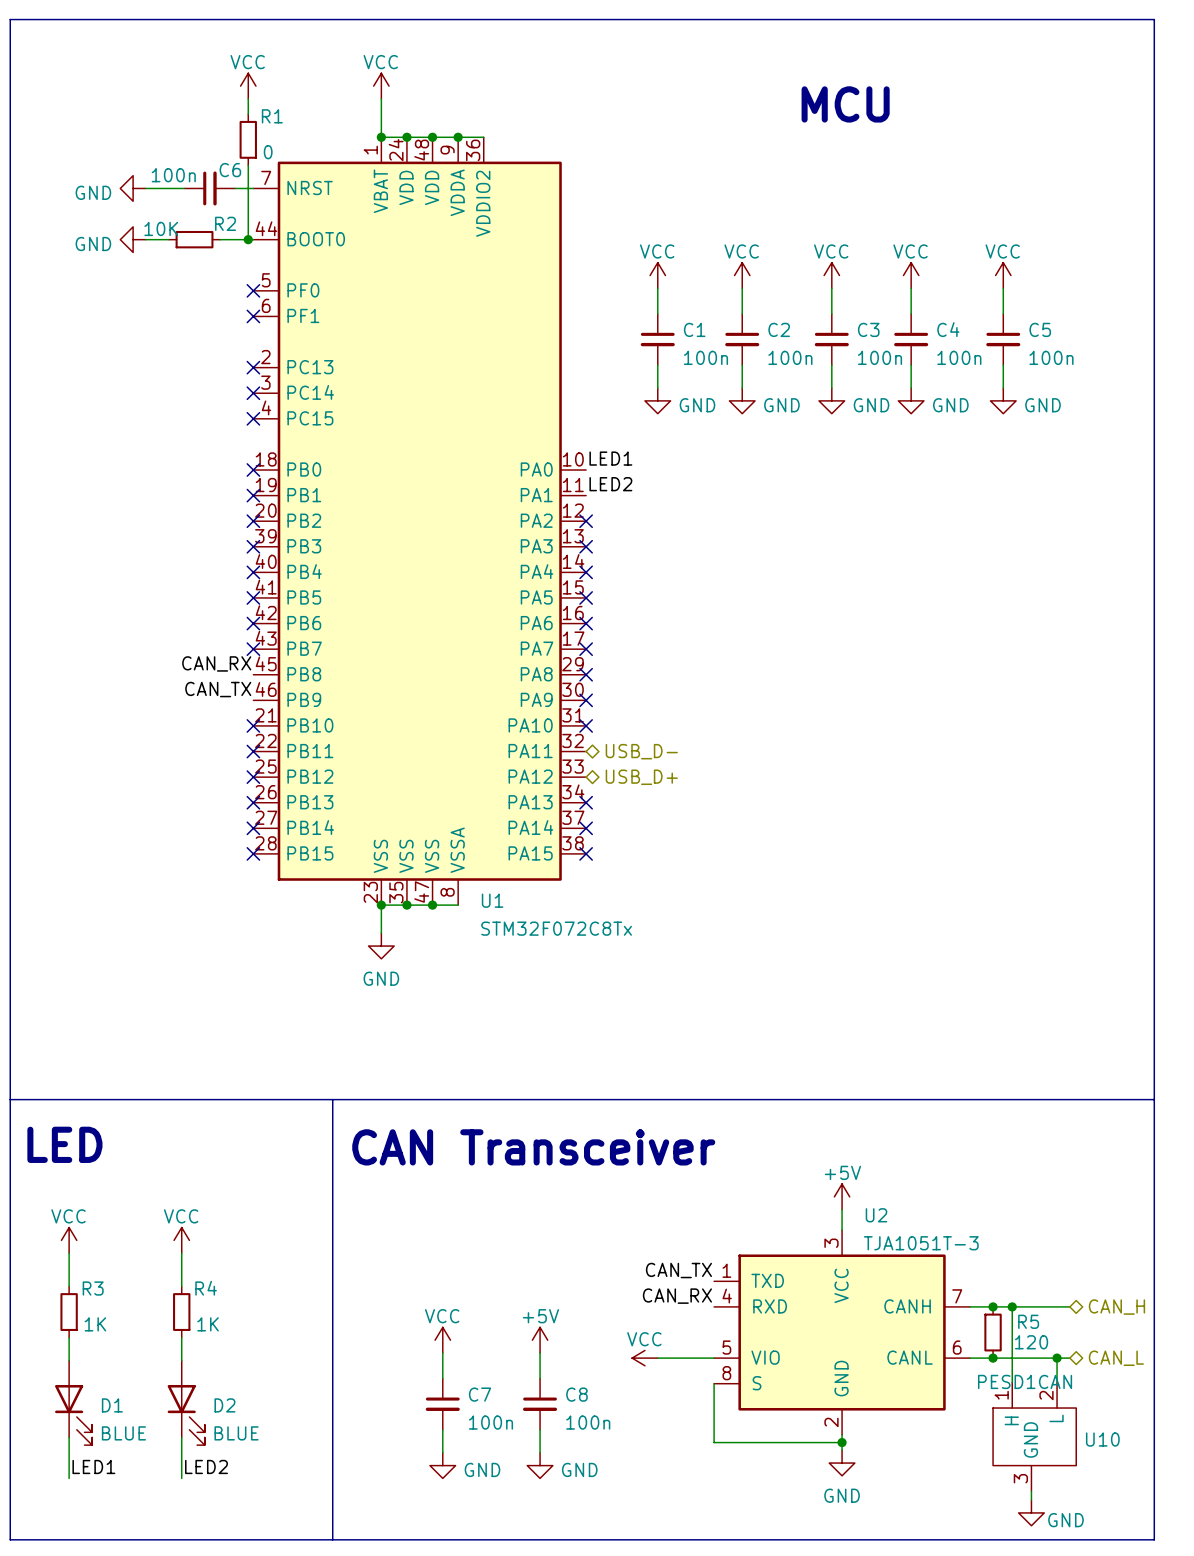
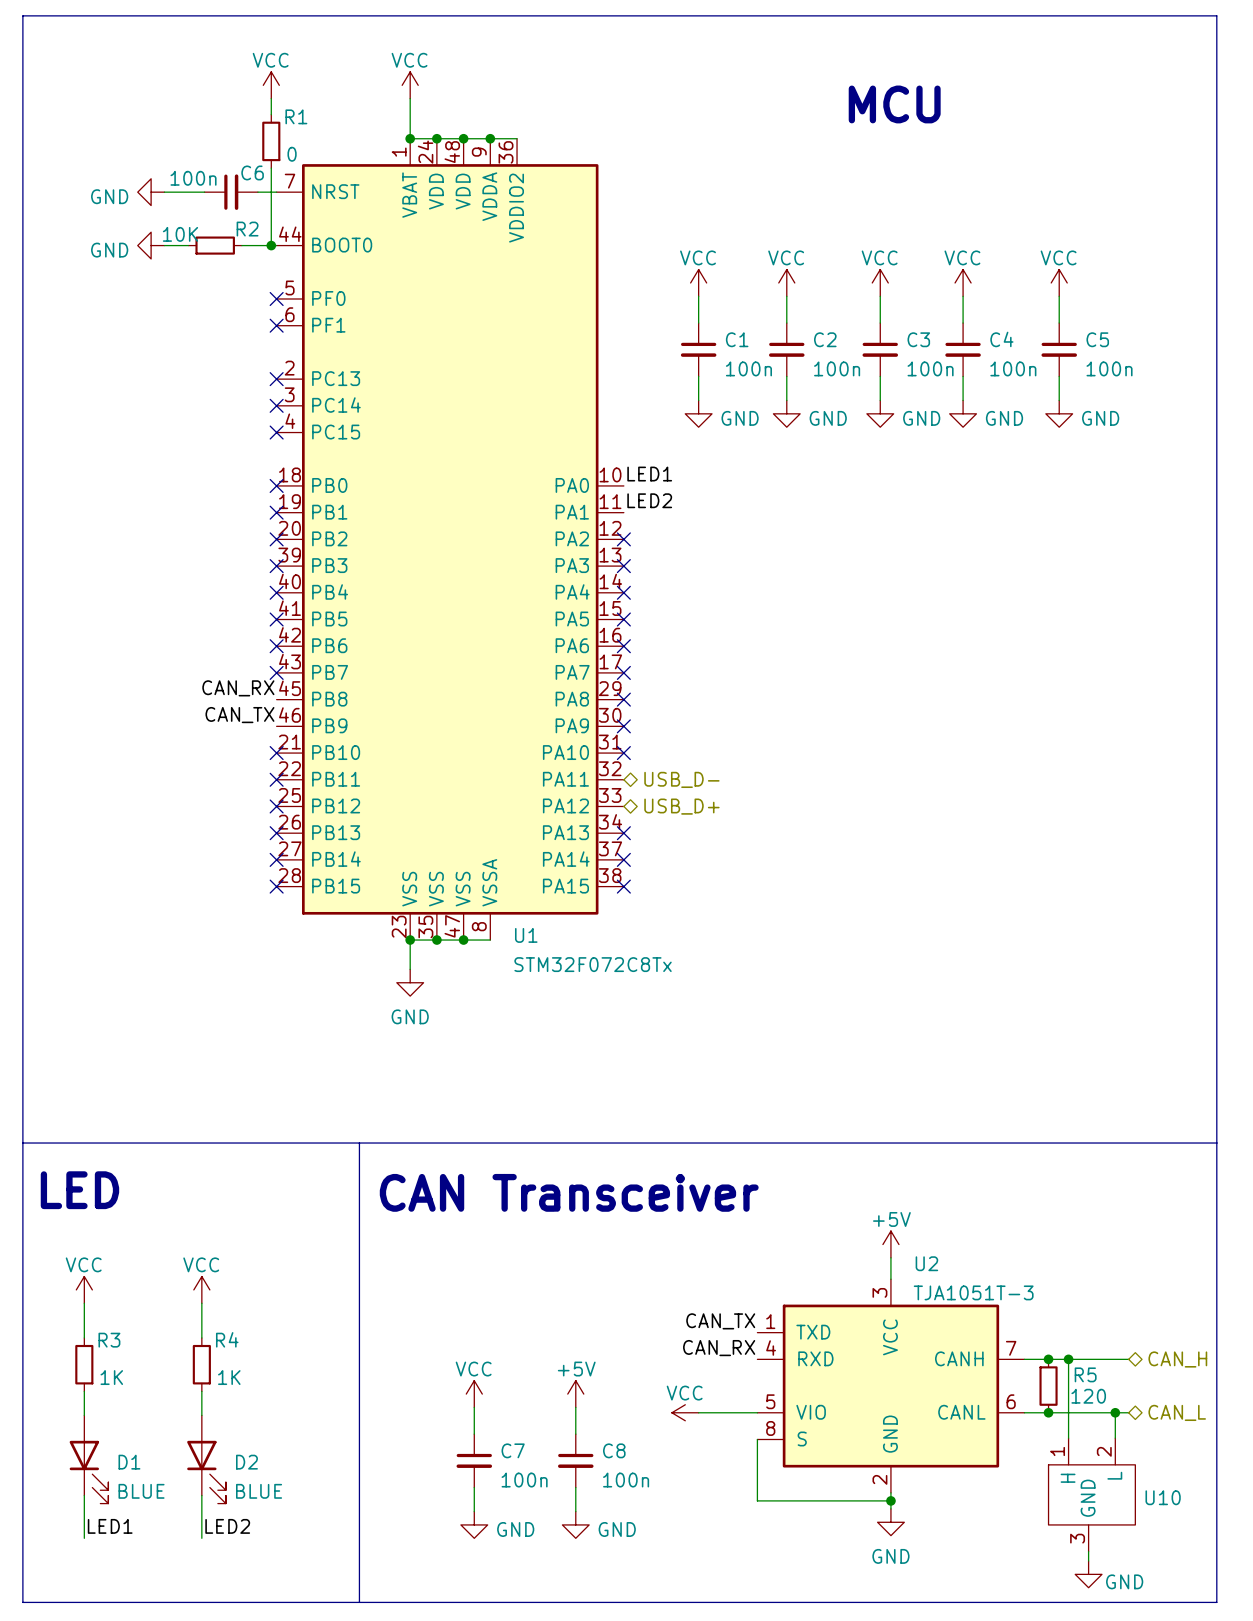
U10 value: PESD1CAN (1025, 1381) -> none

